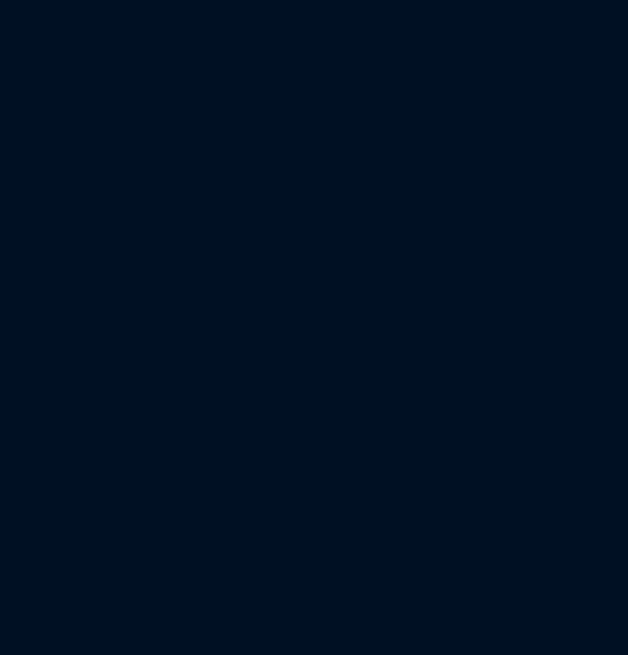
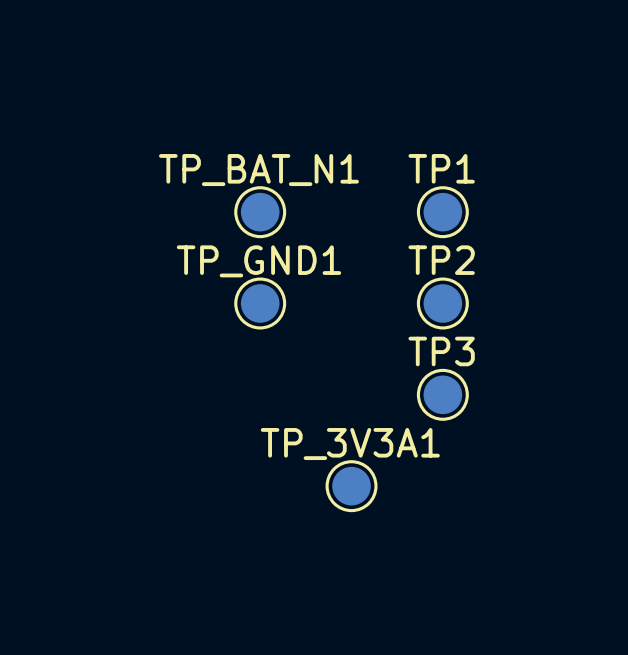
TP_BAT_N1: none -> (260, 212)
TP1: none -> (442, 212)
TP_GND1: none -> (260, 303)
TP2: none -> (442, 303)
TP3: none -> (442, 394)
TP_3V3A1: none -> (351, 486)

